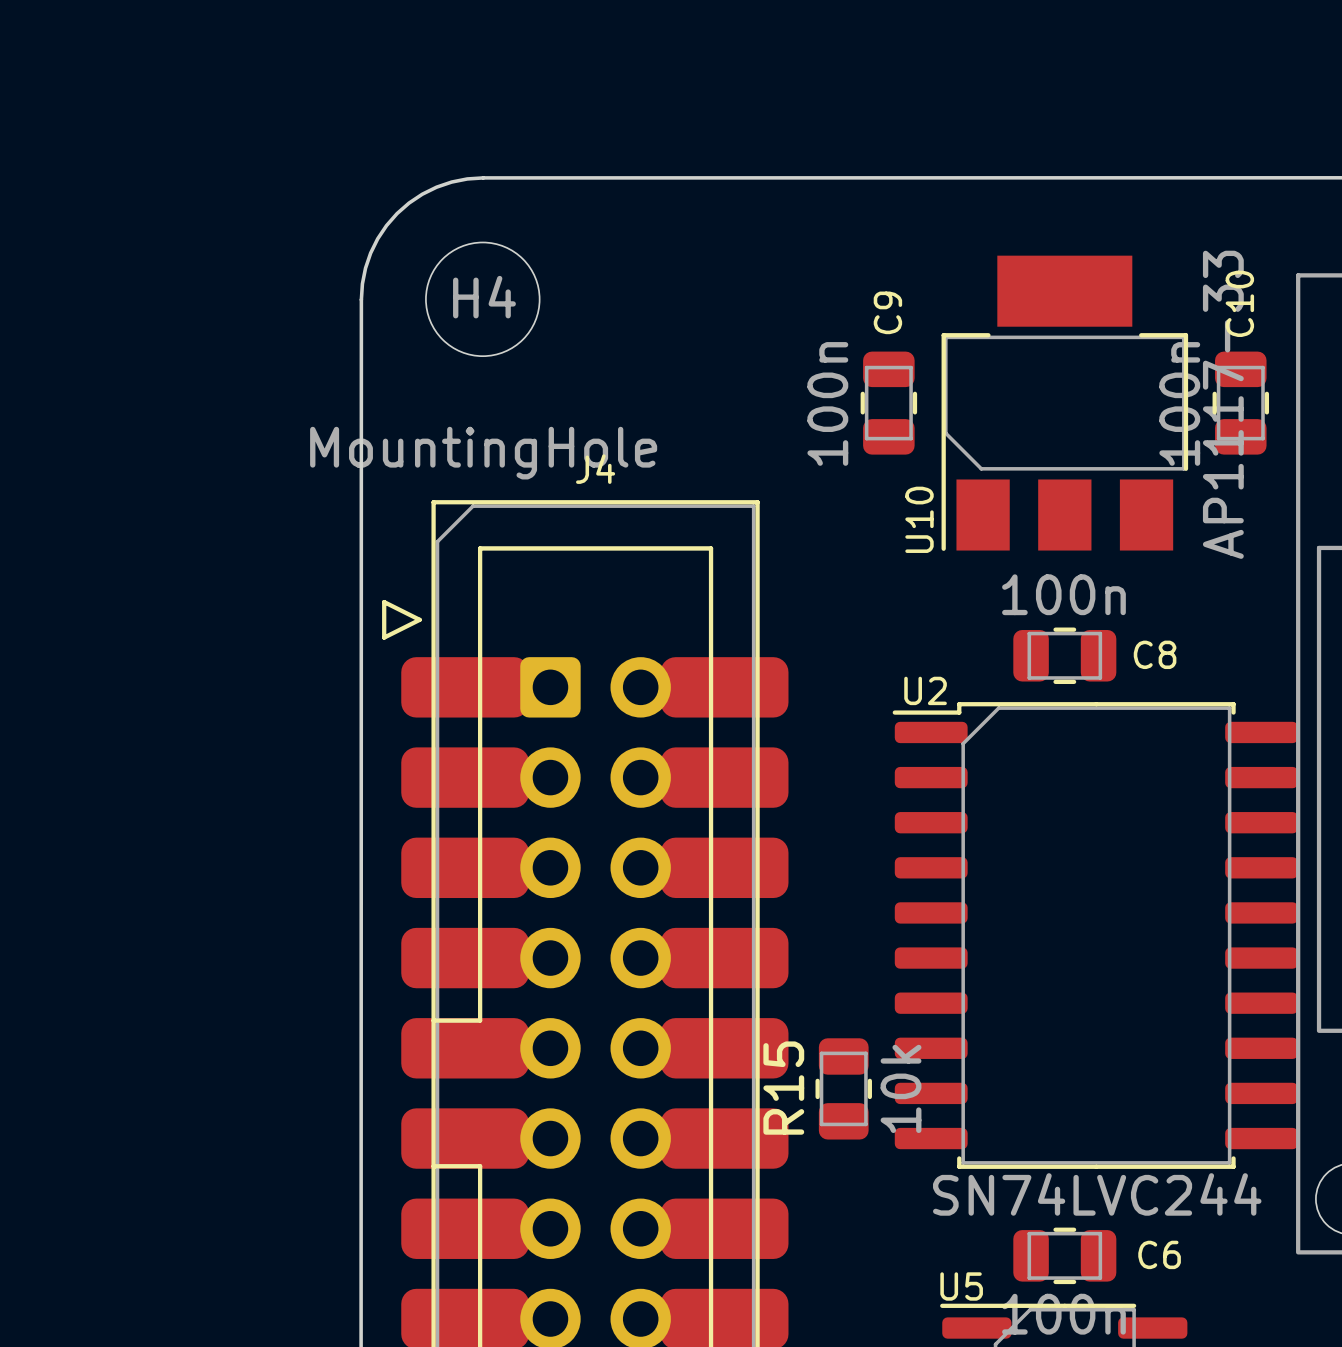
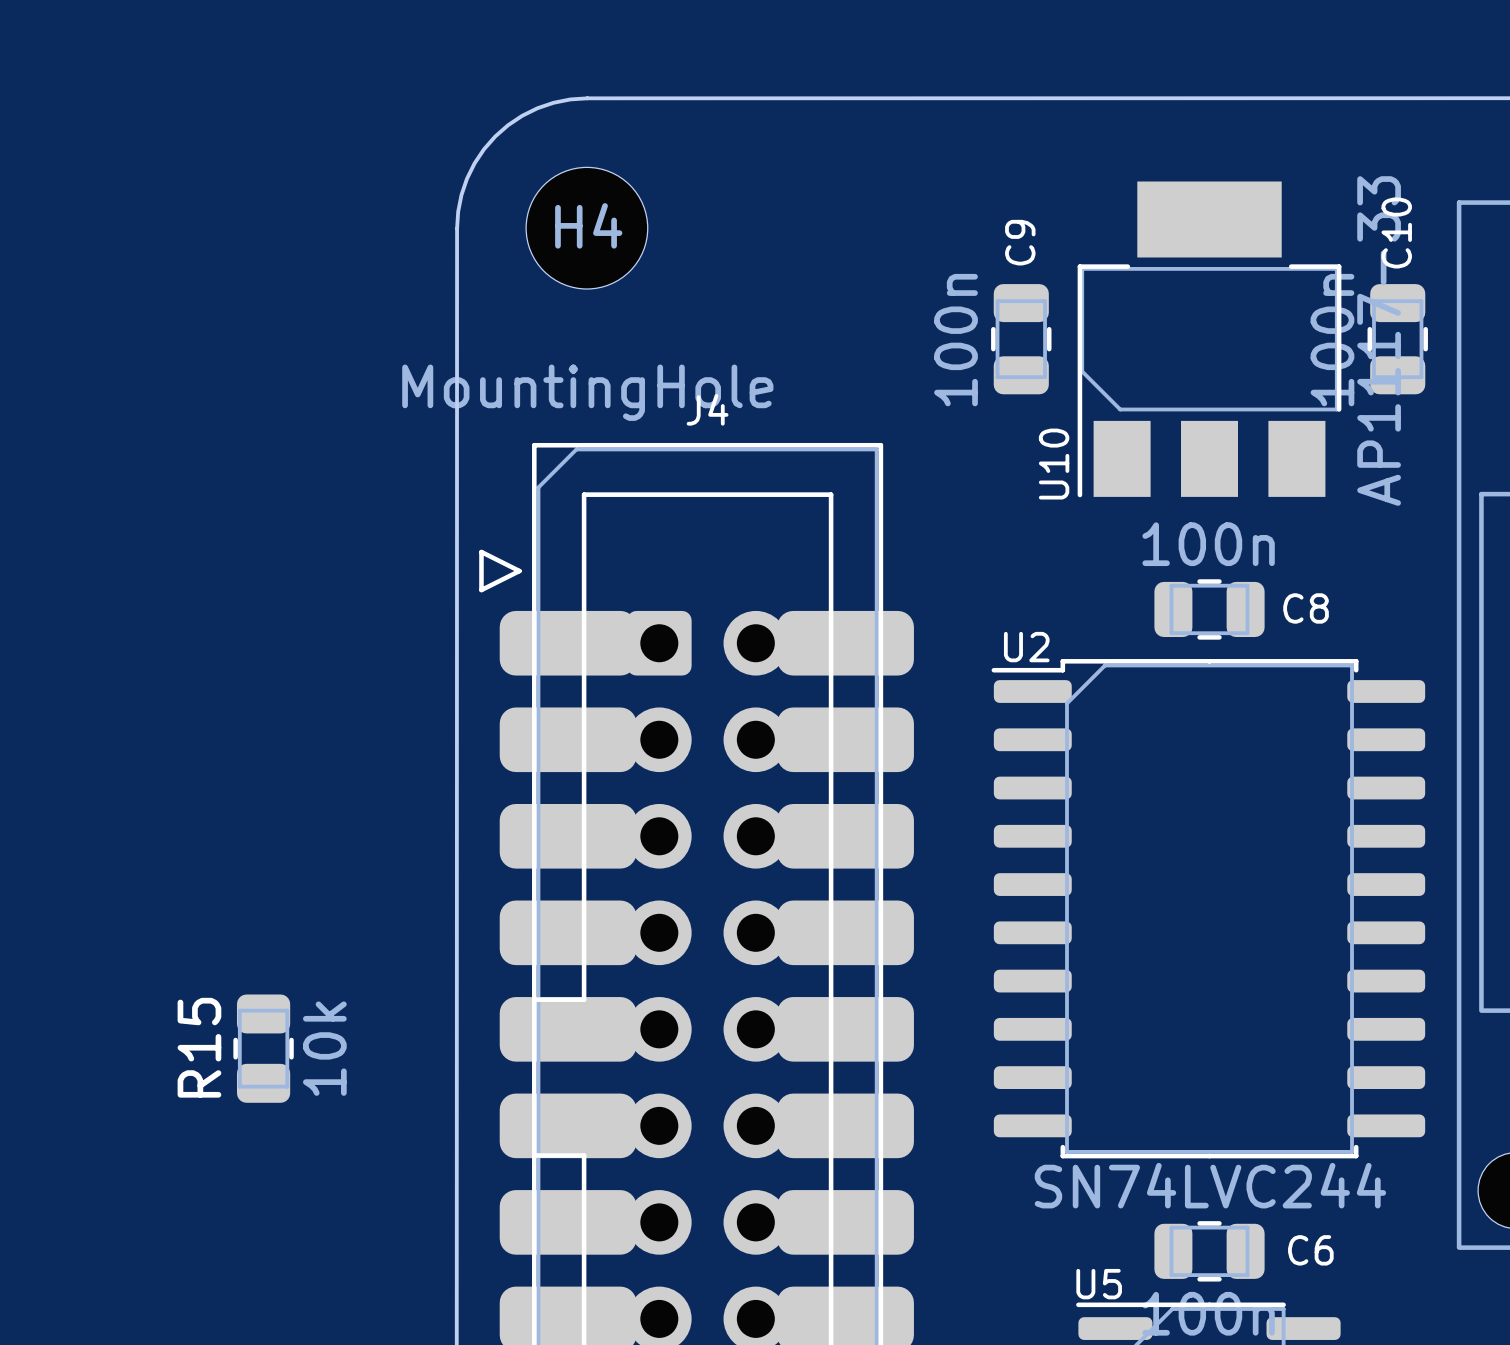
U2 position: (1095, 935) -> (1208, 908)
R15 position: (843, 1088) -> (263, 1048)

